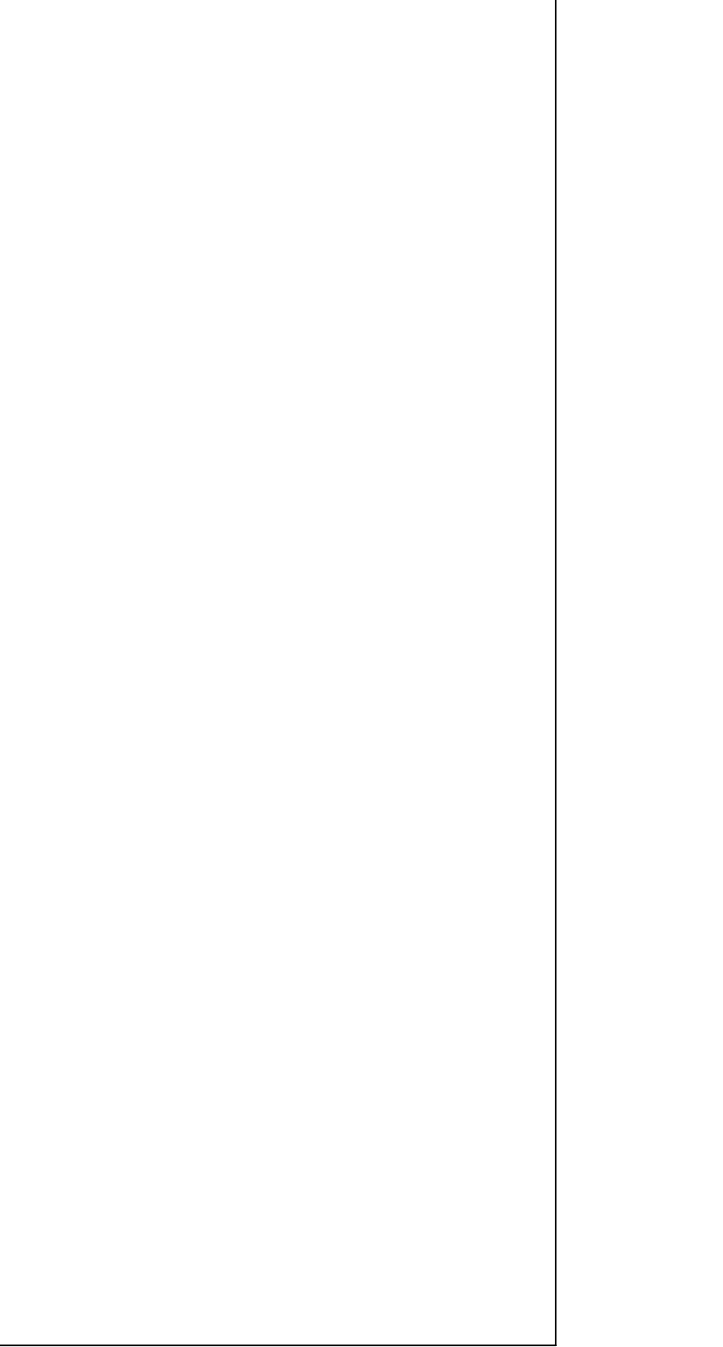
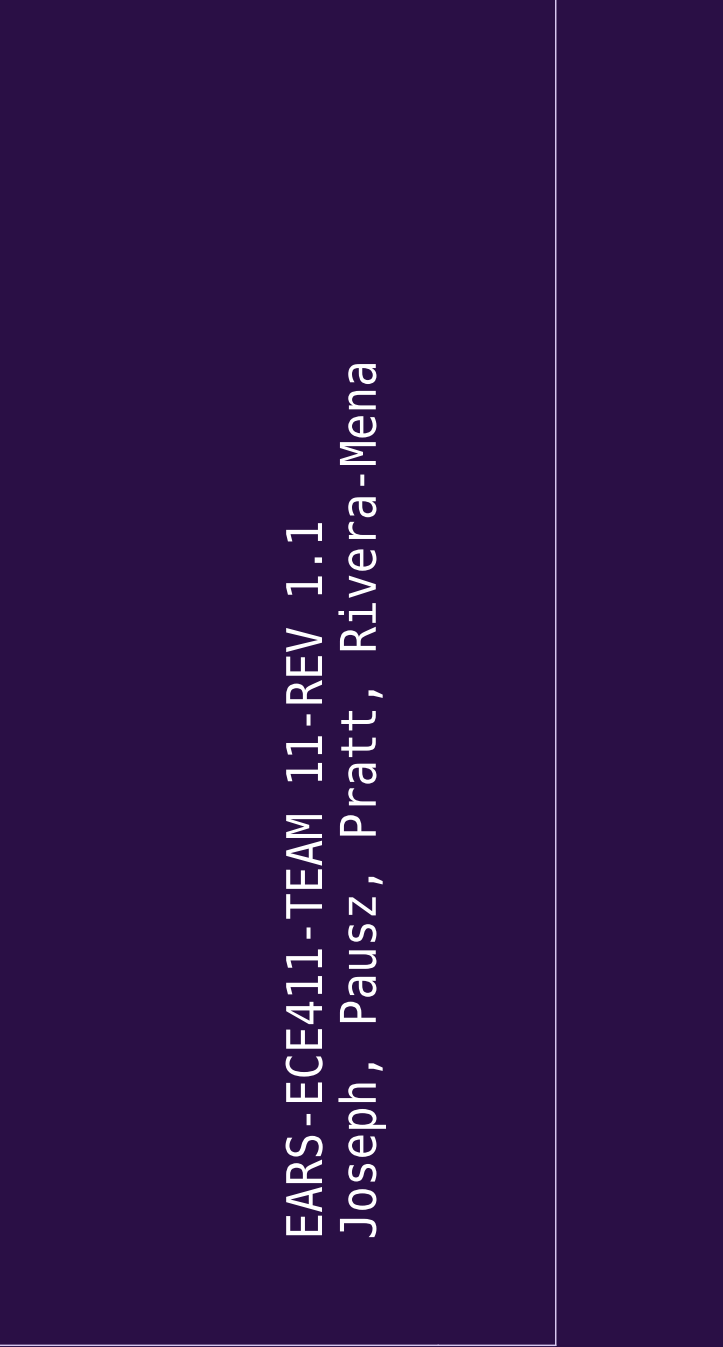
text: none -> Joseph, Pausz, Pratt, Rivera-Mena (362, 800)
text: none -> EARS-ECE411-TEAM 11-REV 1.1 (304, 879)

